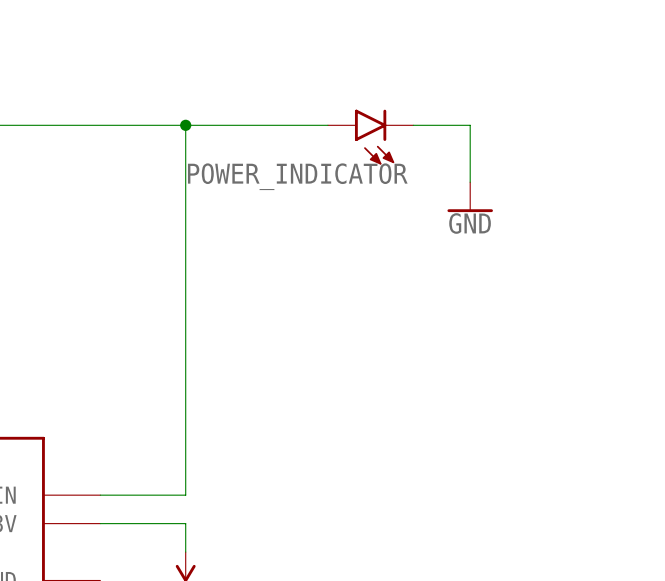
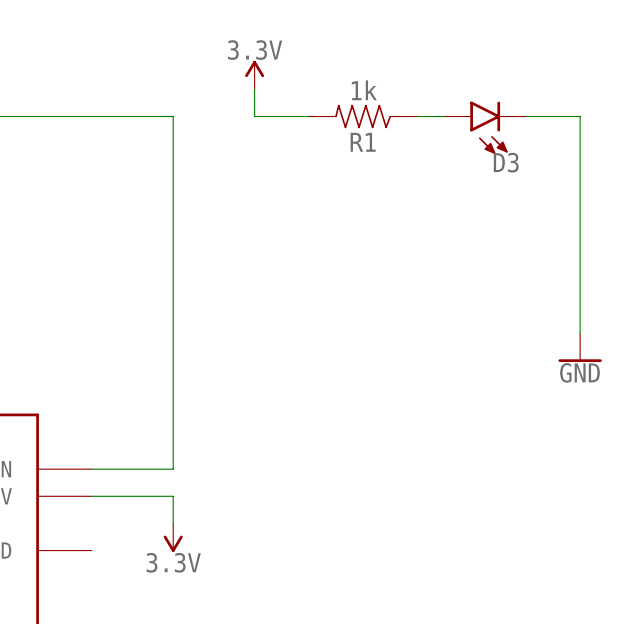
power symbol: none -> 3.3V (254, 75)
wire: (185, 125) (271, 125) -> (254, 89) (254, 116)
junction: (185, 125) -> none
R1: none -> 1k (363, 116)
wire: (470, 125) (470, 182) -> none
wire: none -> (525, 116) (580, 116) (580, 333)
POWER_INDICATOR: (370, 137) -> none
D3: none -> (485, 127)
power symbol position: GND (470, 197) -> GND (580, 347)

